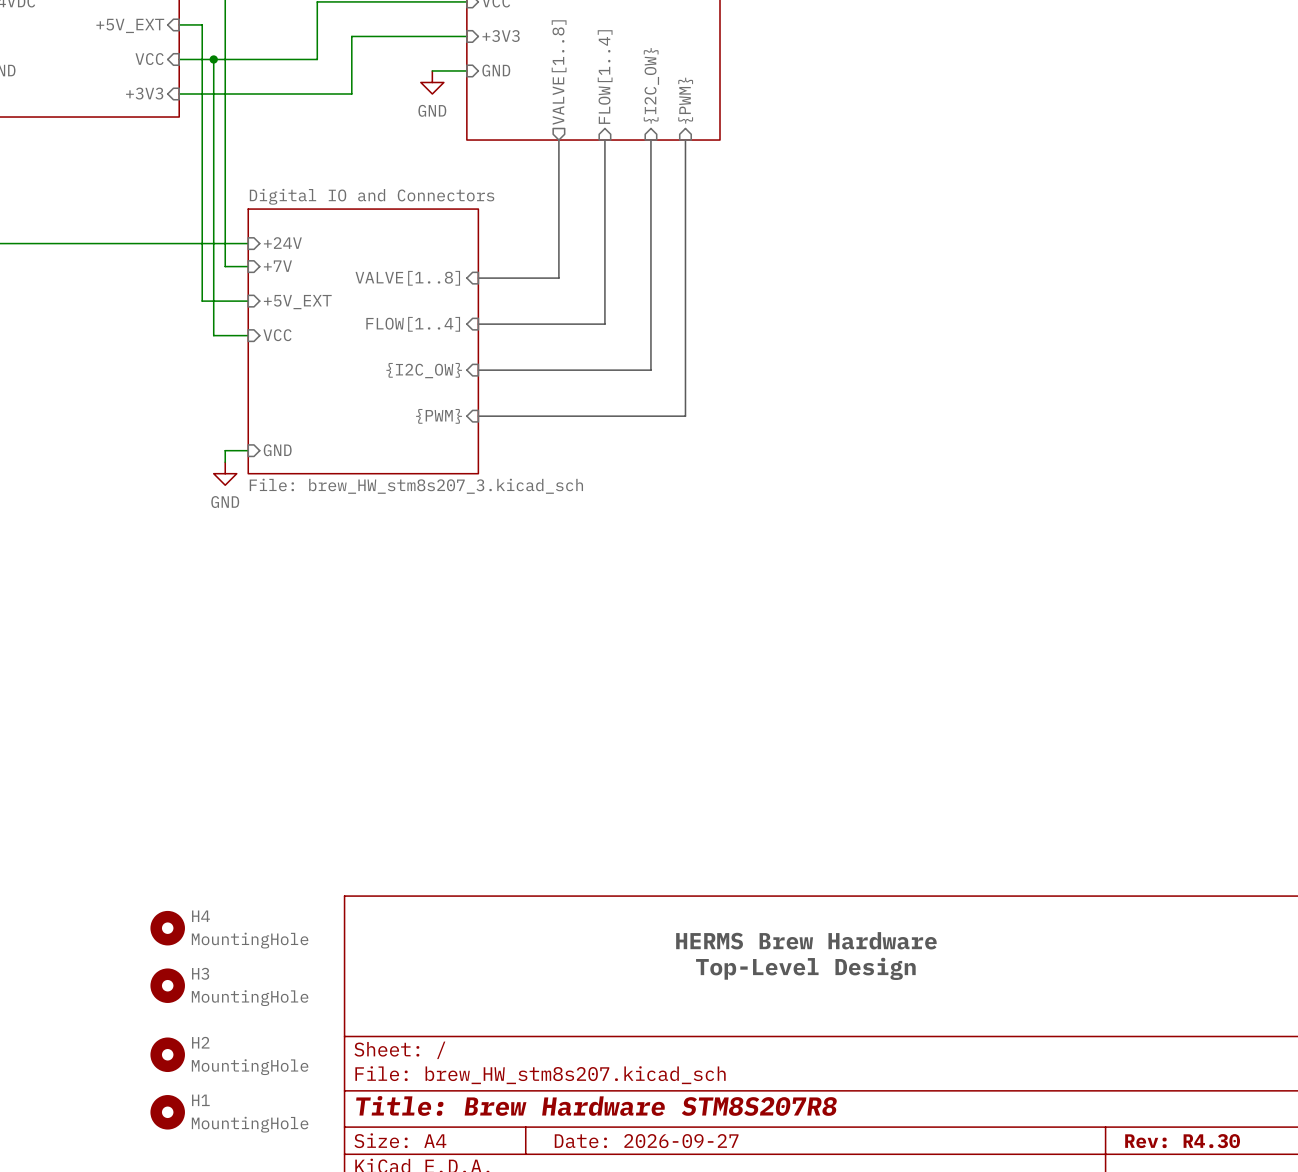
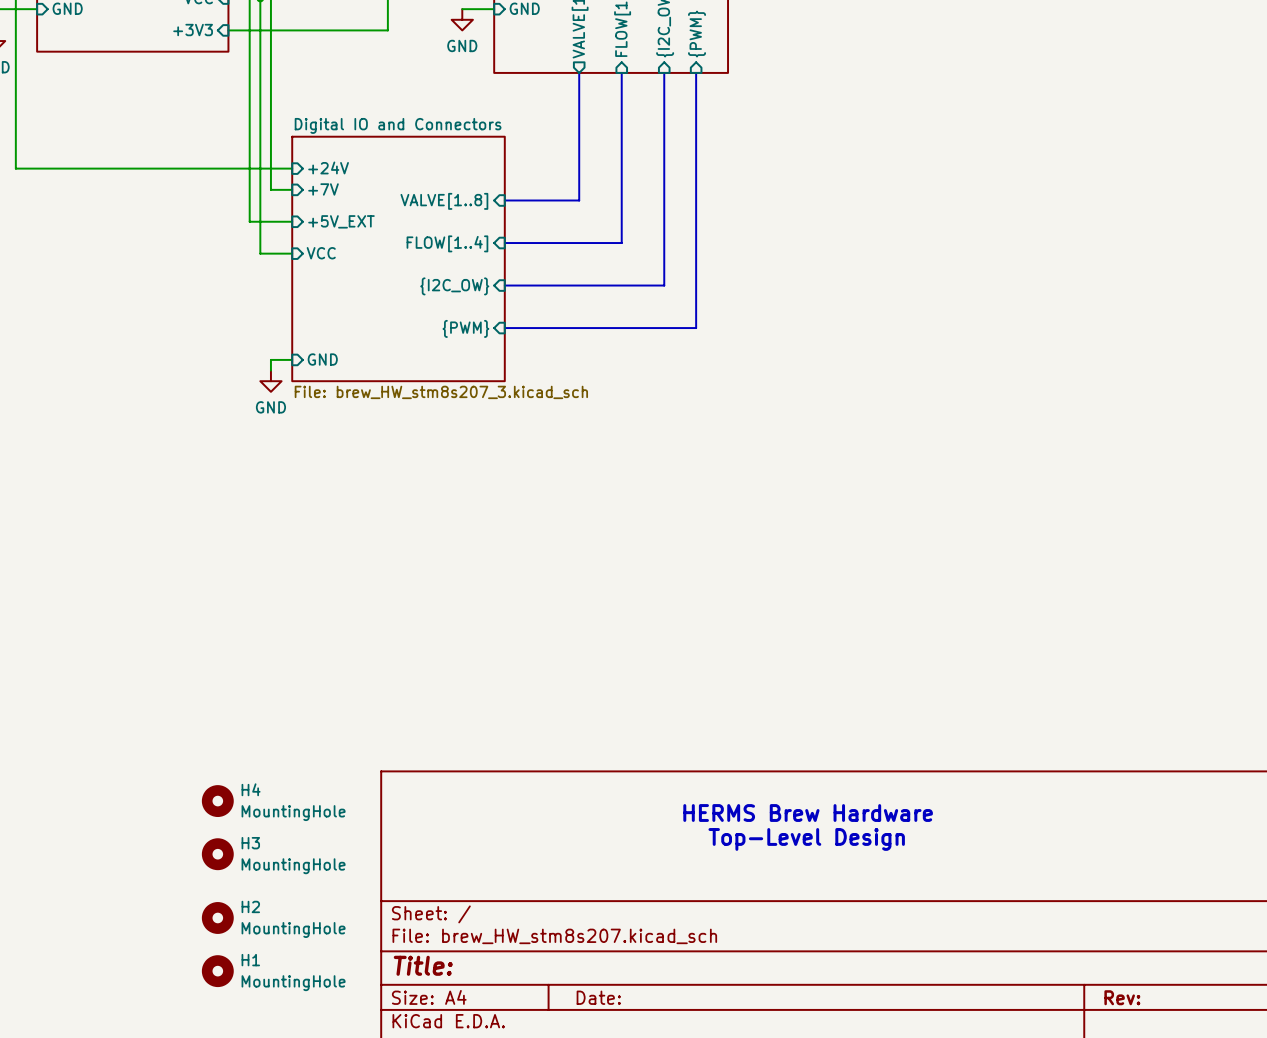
title block: Title: Brew Hardware STM8S207R8 (596, 1105) -> Title: (423, 965)
title block: Date: 2026-09-27 (646, 1141) -> Date: (598, 997)
title block: Rev: R4.30 (1182, 1141) -> Rev: (1122, 997)

